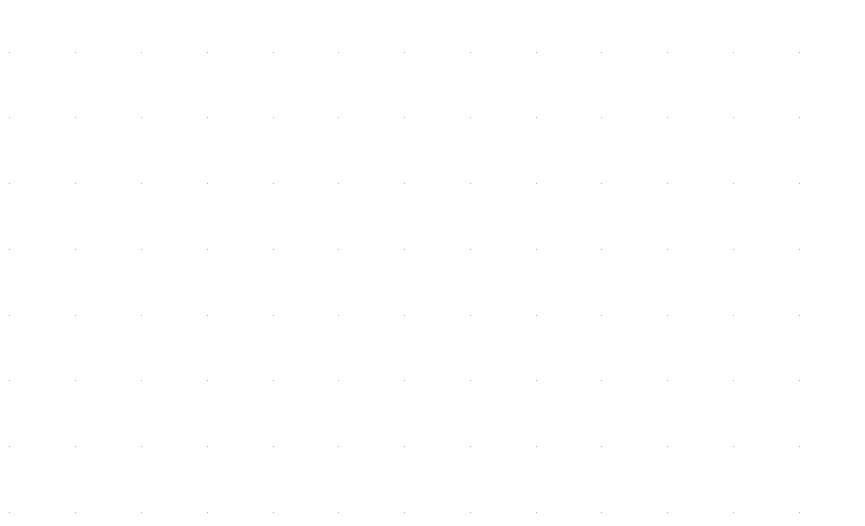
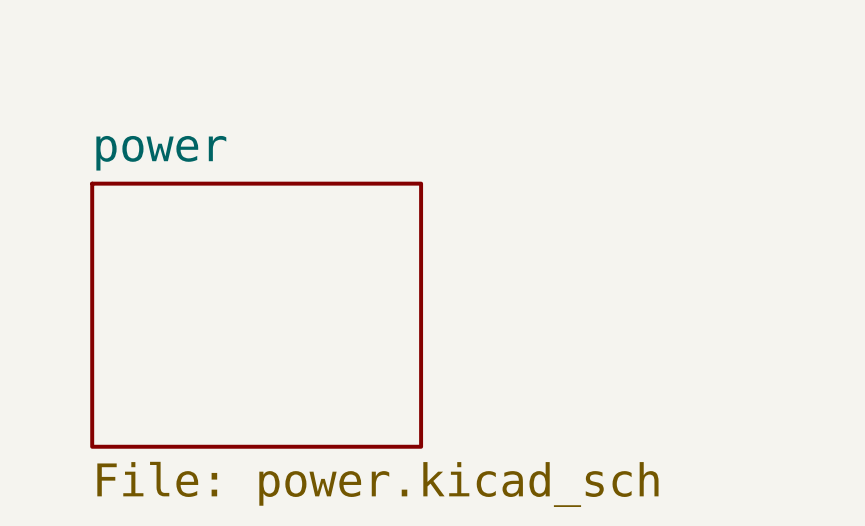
sheet power: none -> File: power.kicad_sch (256, 315)

